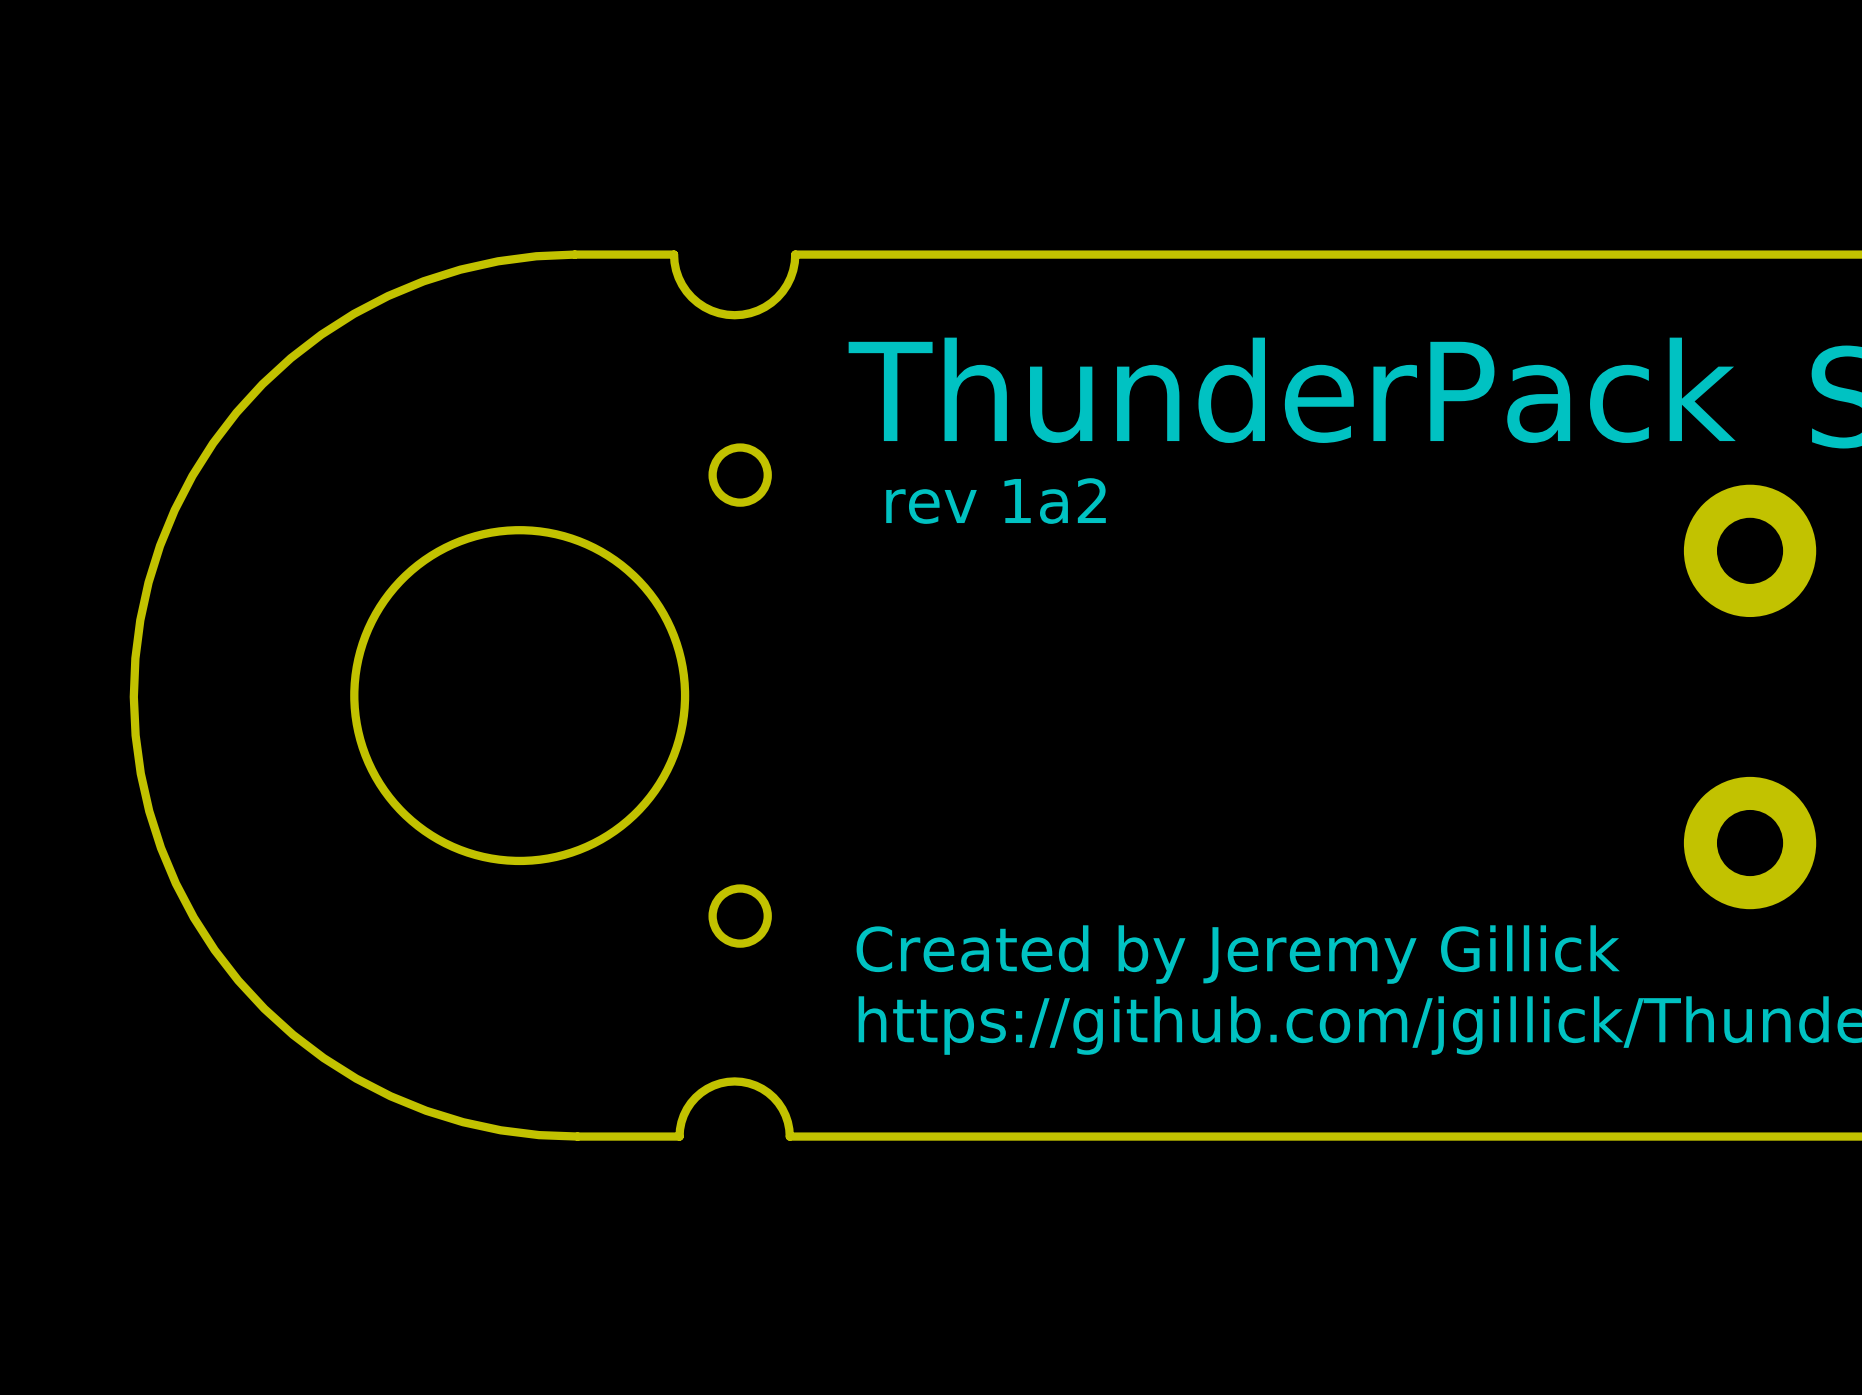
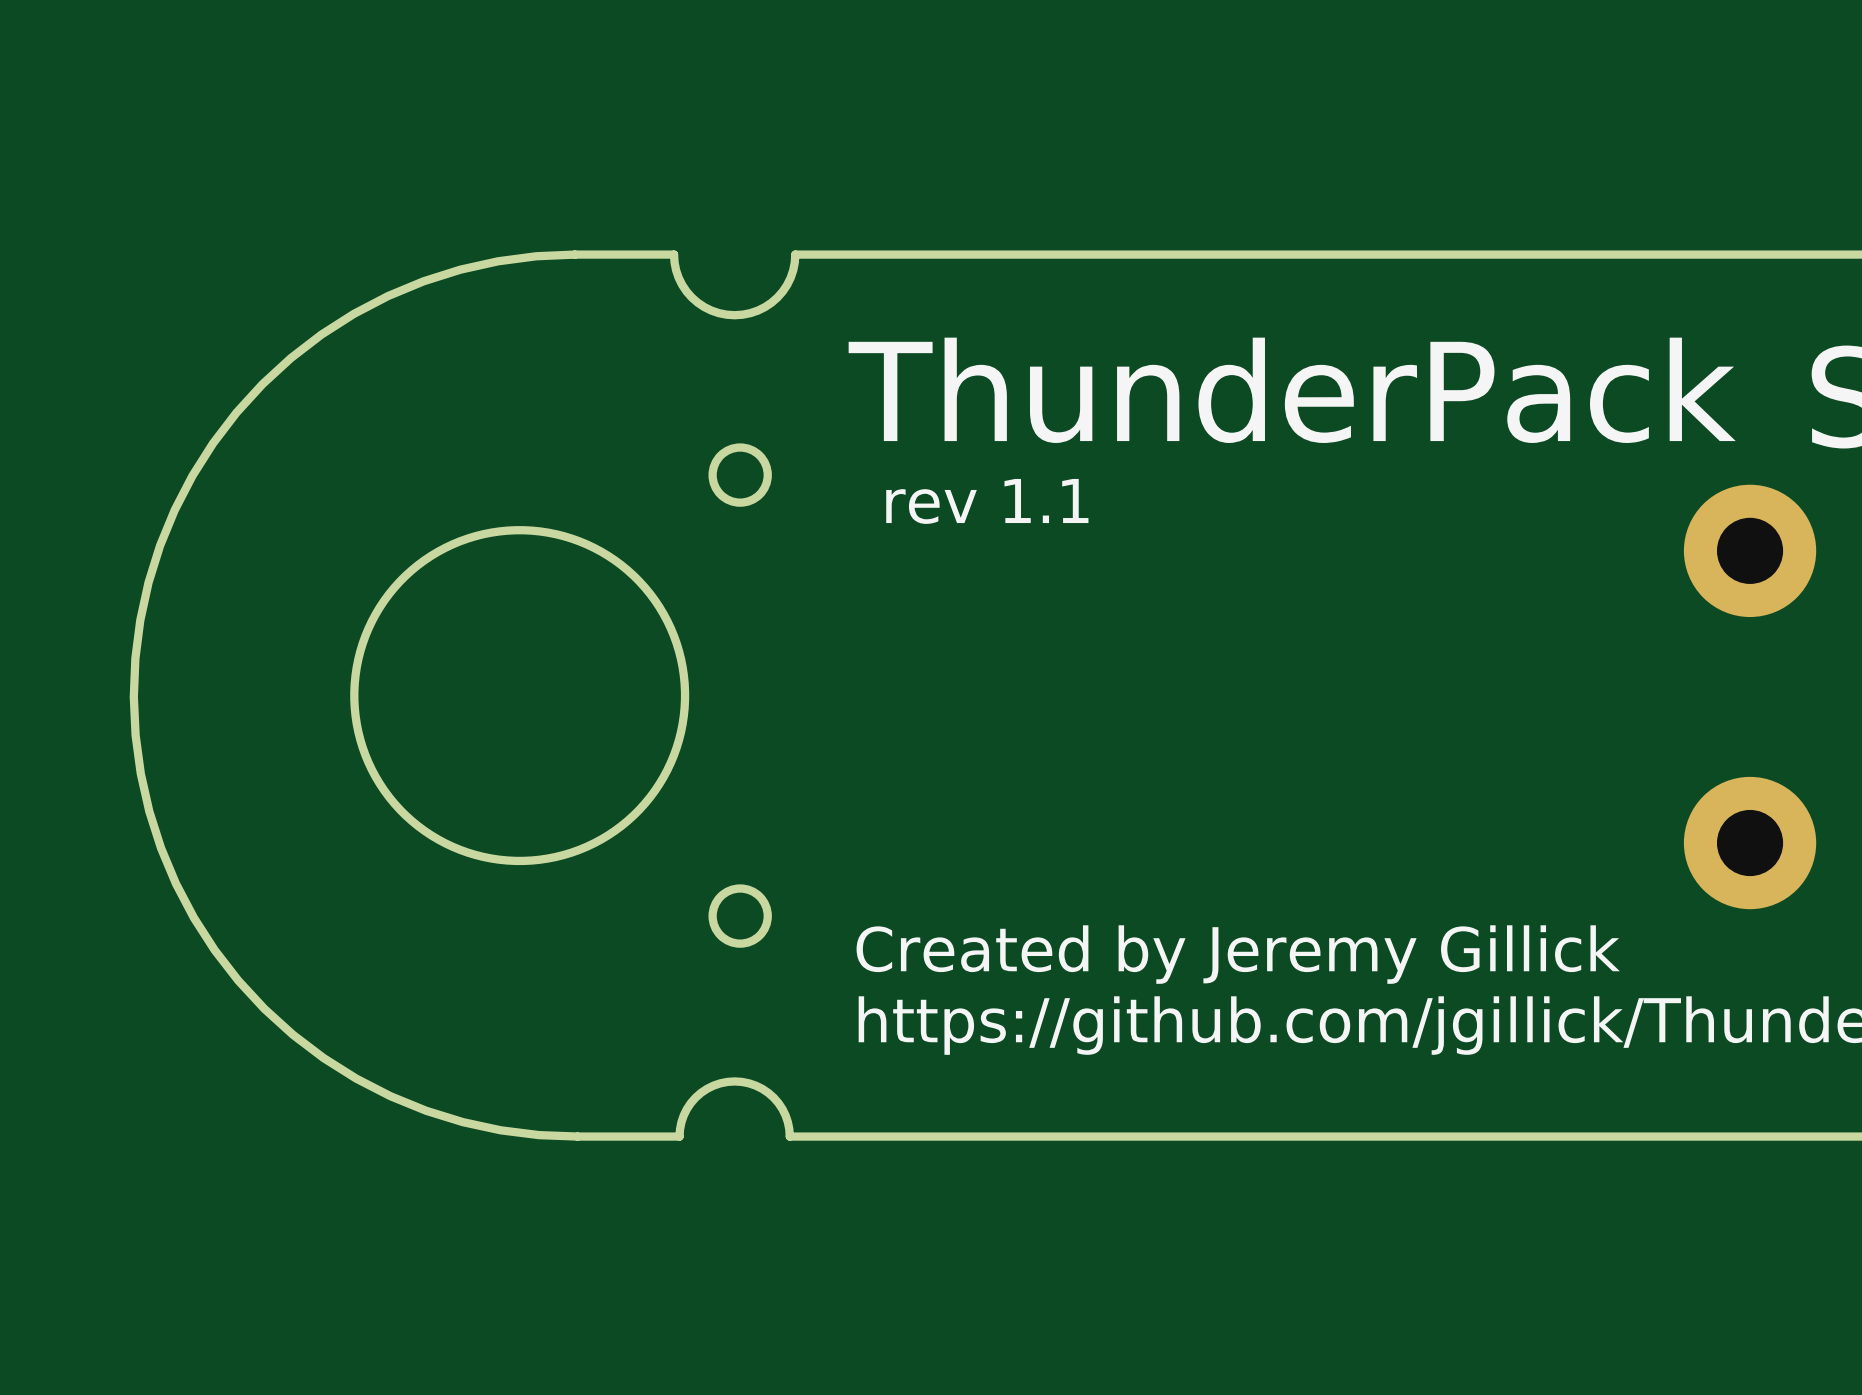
text: rev 1a2 (996, 501) -> rev 1.1 (987, 501)

